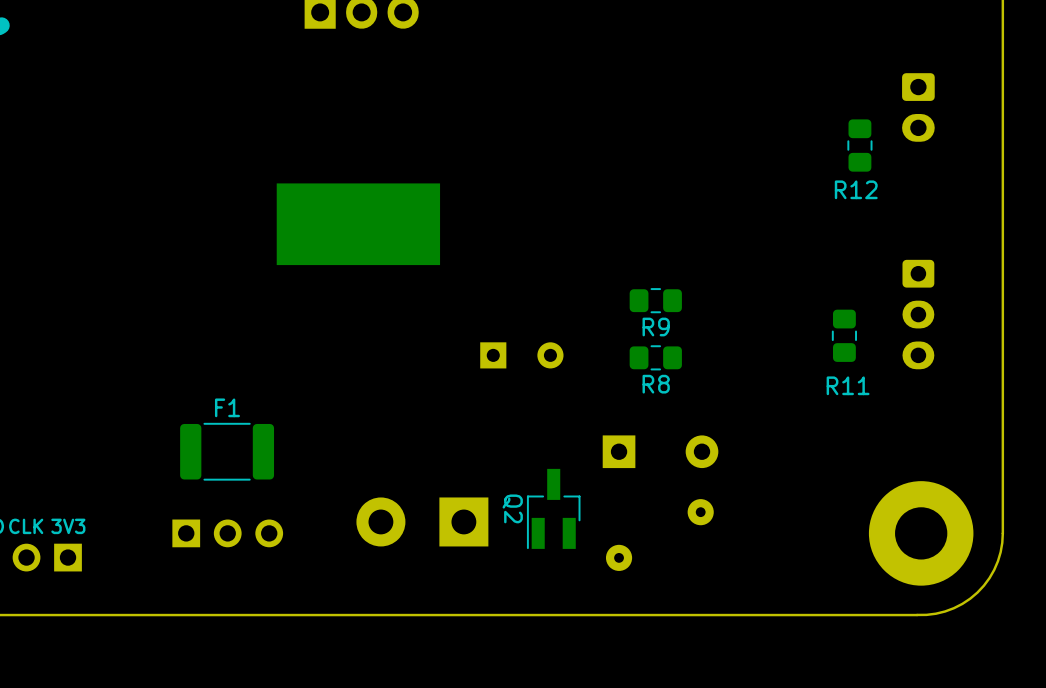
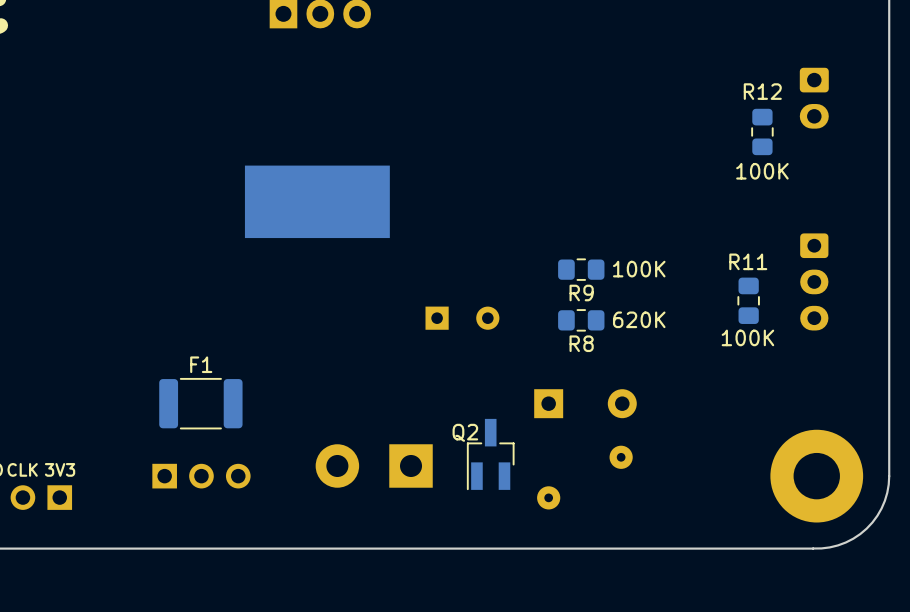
R12 name position: R12 (856, 189) -> R12 (762, 91)
R12 value: none -> 100K (762, 171)
R9 value: none -> 100K (639, 269)
R8 value: none -> 620K (639, 319)
R11 value: none -> 100K (747, 337)
R11 name position: R11 (848, 385) -> R11 (748, 261)
Q2 name rotation: 0° (512, 508) -> 90° counterclockwise (465, 432)

